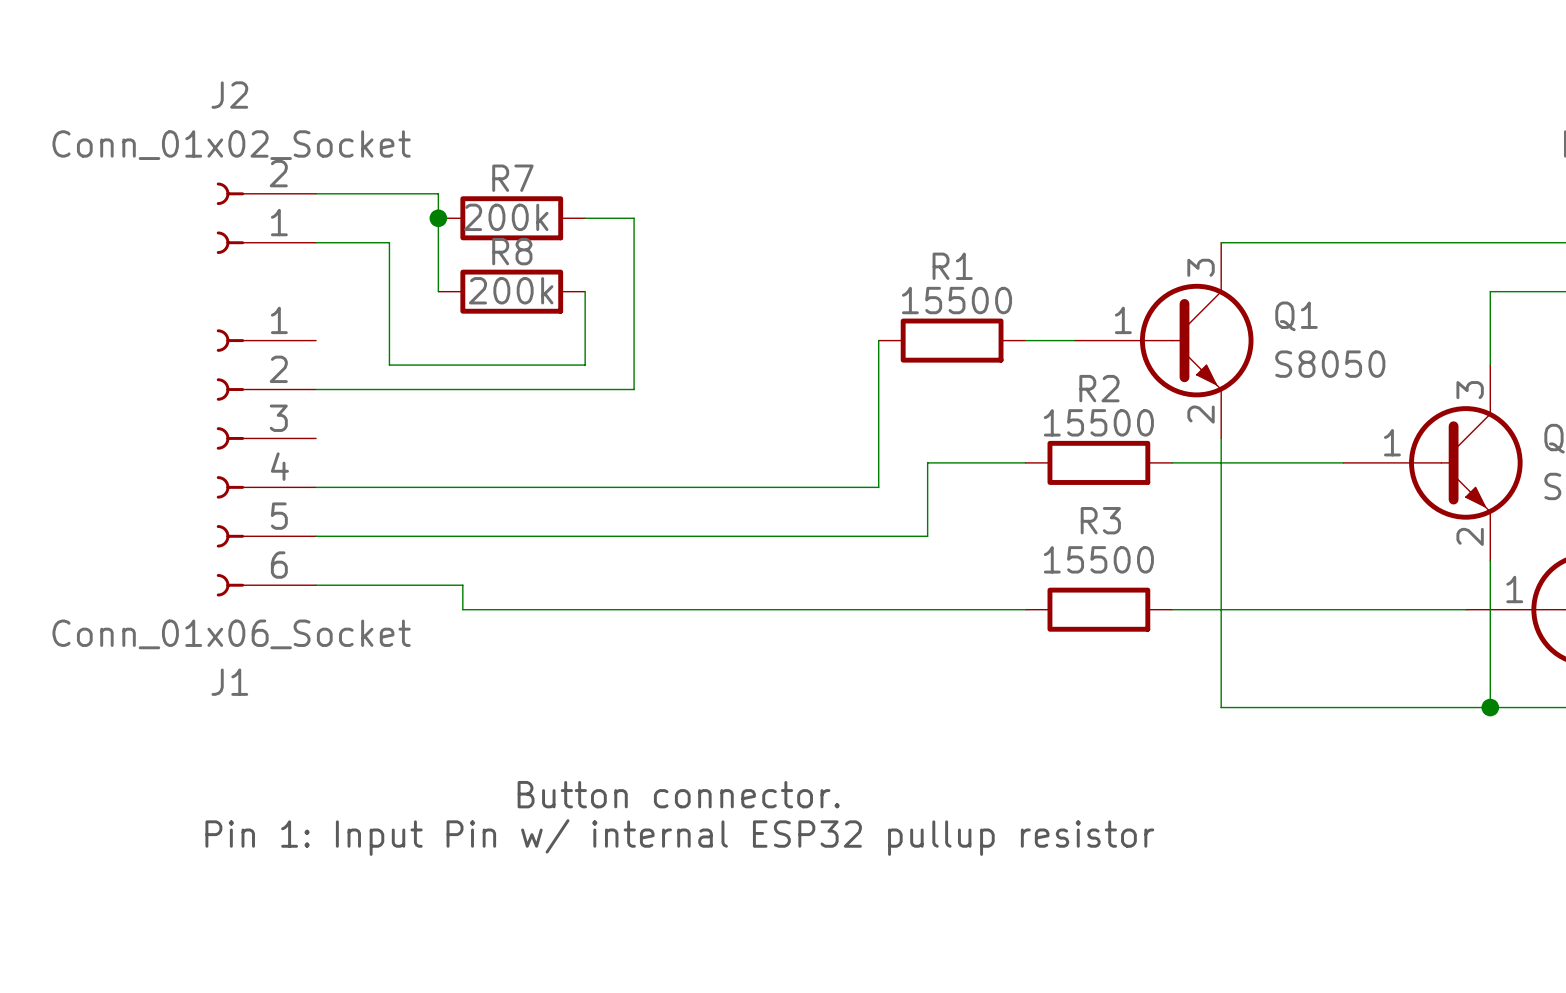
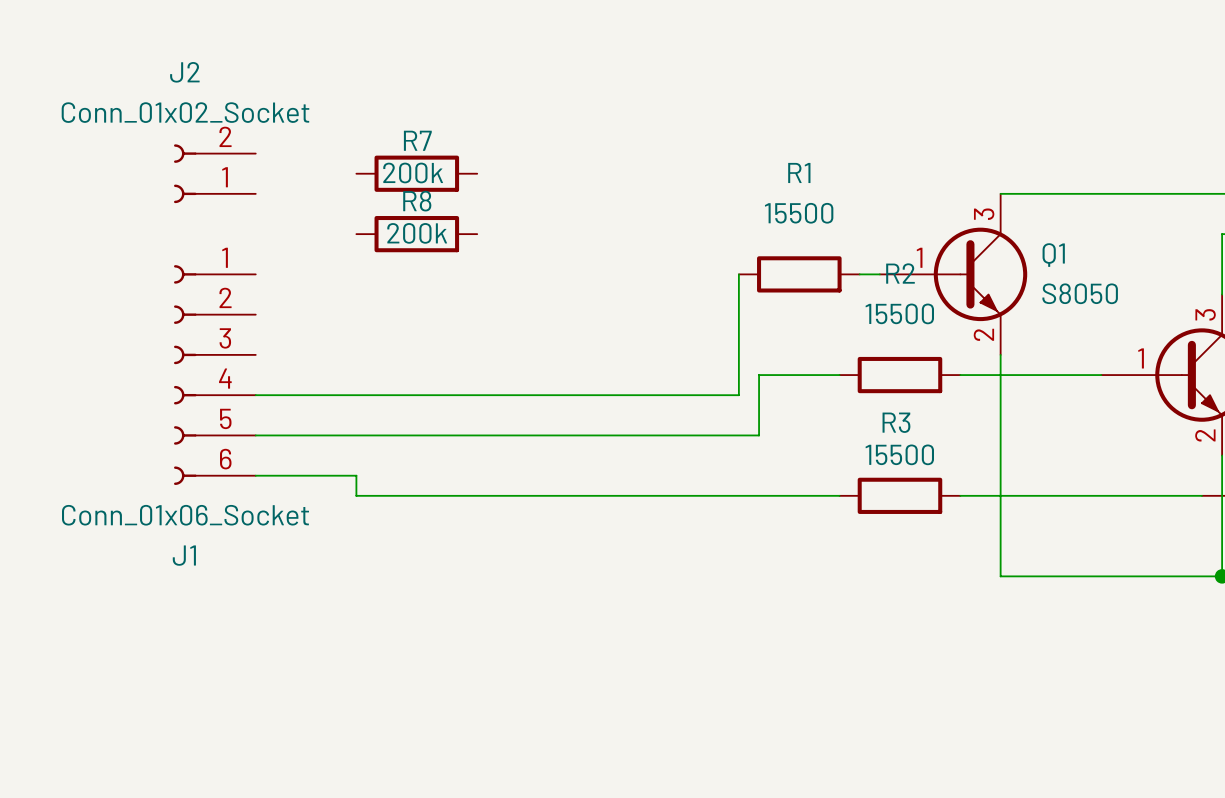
wire: (316, 193) (438, 193) (438, 291) -> none
junction: (438, 218) -> none
wire: (585, 218) (634, 218) (634, 389) (316, 389) -> none
wire: (316, 242) (389, 242) (389, 365) (585, 365) (585, 291) -> none
R1 name position: R1 (952, 266) -> R1 (799, 172)
R1 value position: 15500 (956, 300) -> 15500 (799, 213)
wire: (878, 340) (878, 487) -> (738, 274) (738, 395) (718, 395)
R1 position: (952, 340) -> (799, 274)
R2 name position: R2 (1099, 388) -> R2 (900, 273)
R2 value position: 15500 (1098, 422) -> 15500 (899, 313)
wire: (438, 585) (462, 585) (462, 609) -> (356, 475) (356, 495) (376, 495)
text: Button connector. (678, 794) -> none
text: Pin 1: Input Pin w/ internal ESP32 pullup resistor (679, 837) -> none

